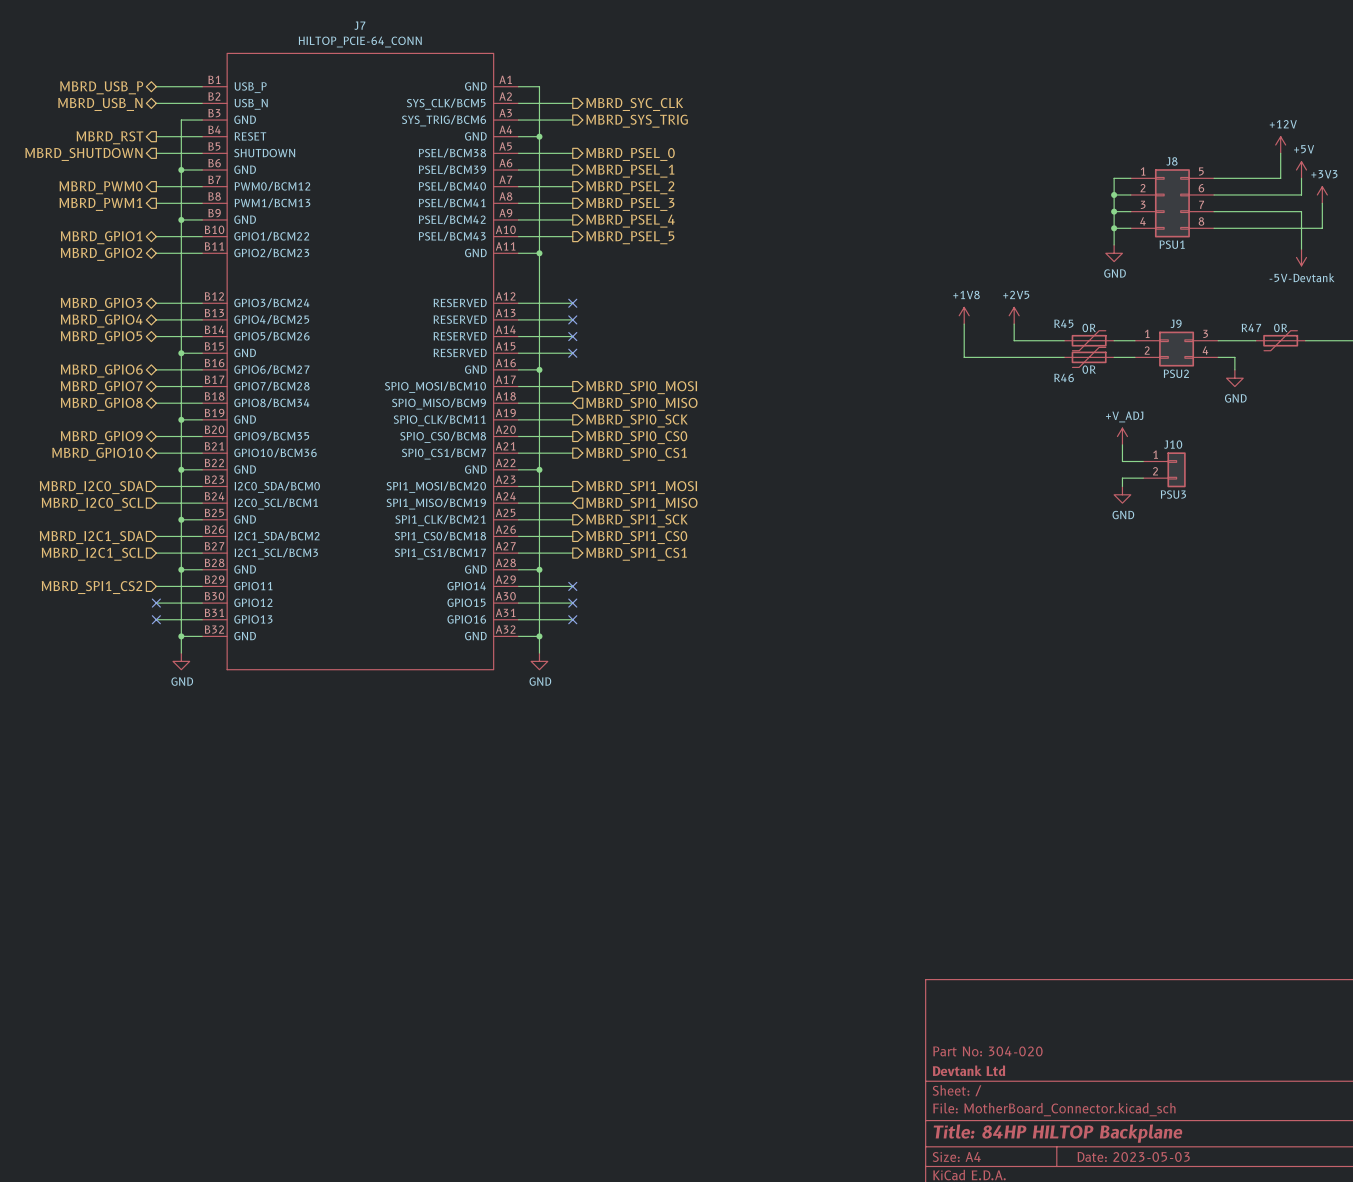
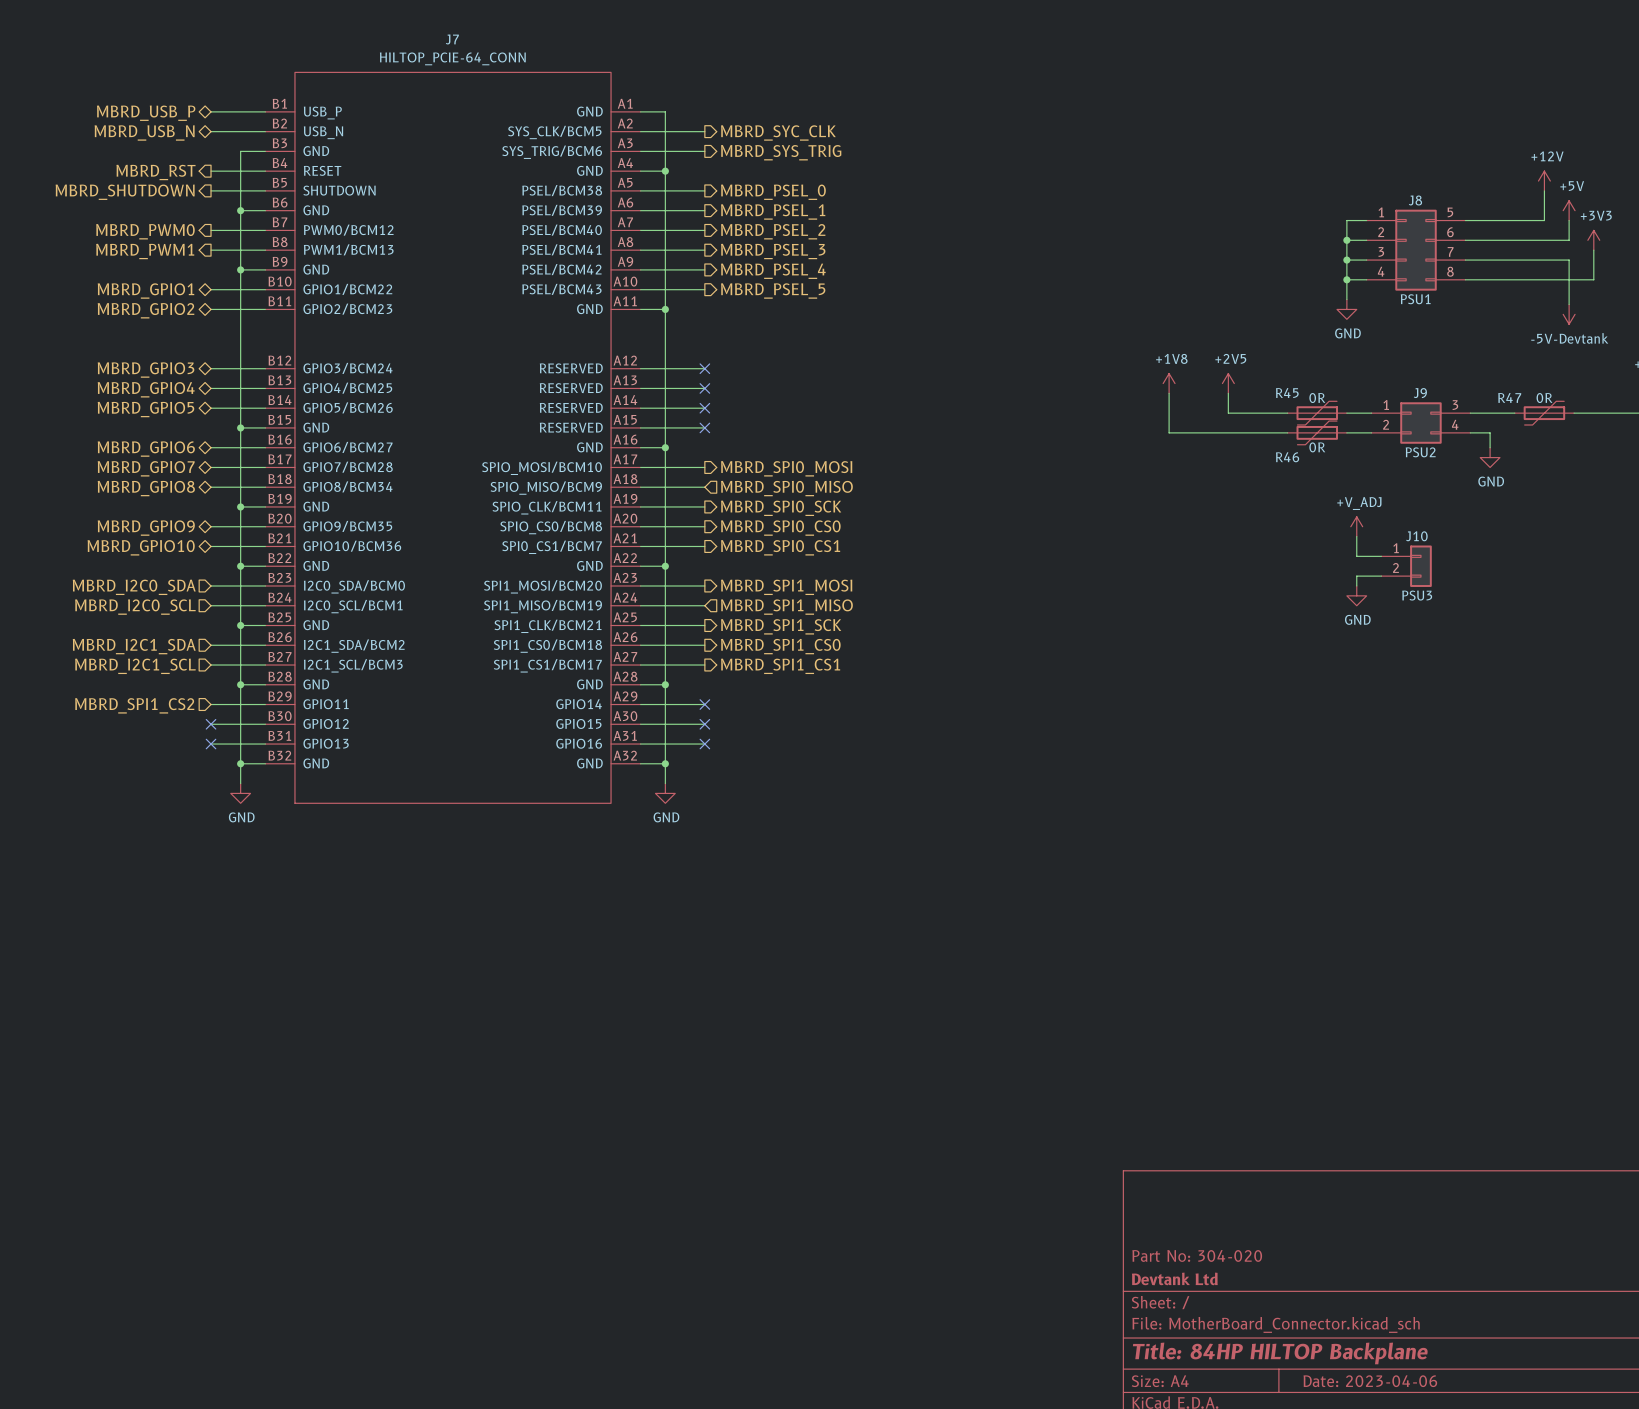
title block: Date: 2023-05-03 (1133, 1157) -> Date: 2023-04-06 (1370, 1381)

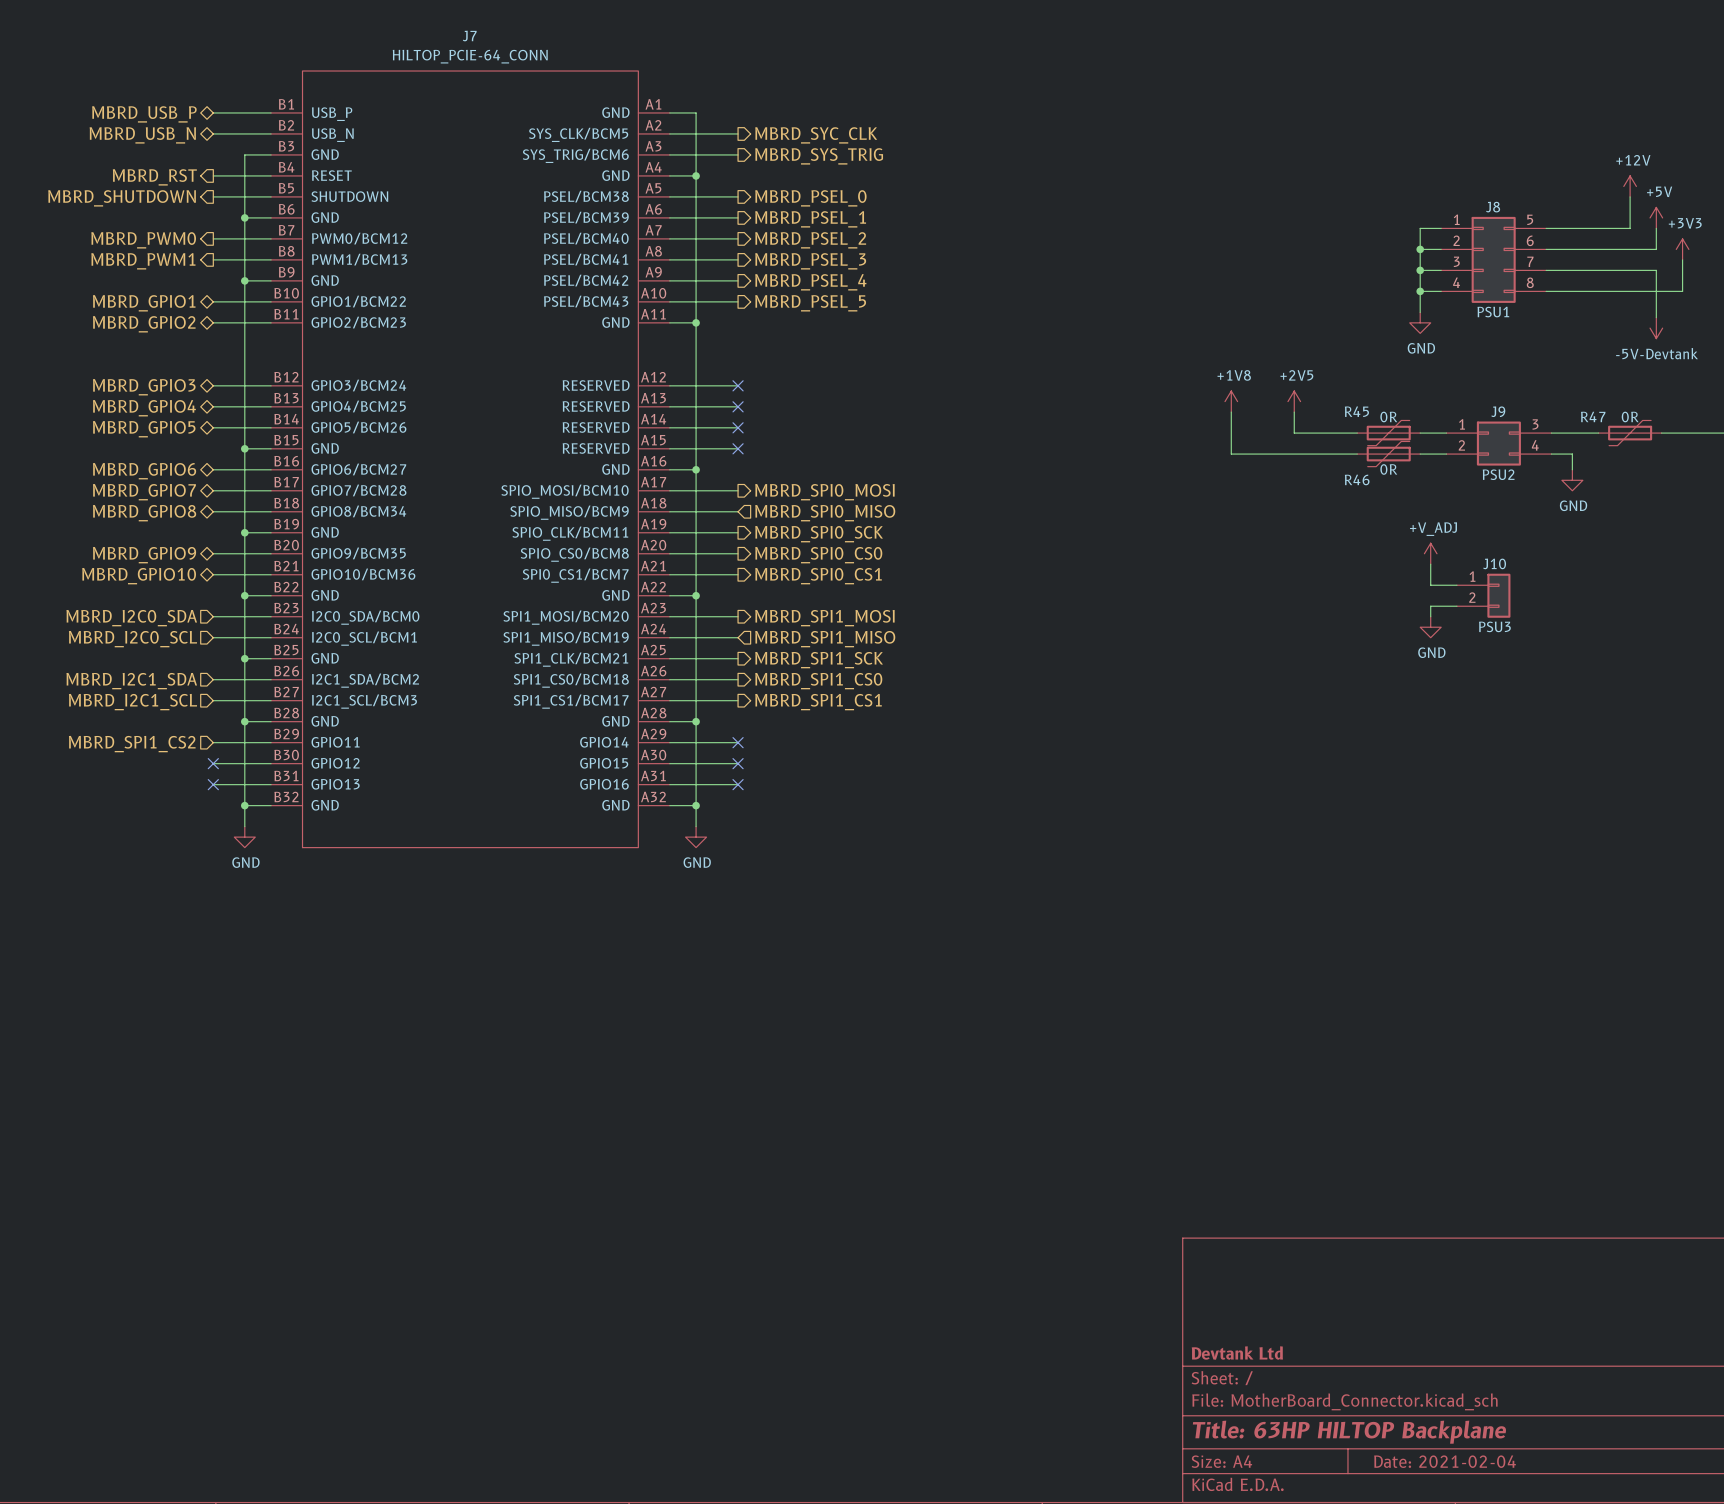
title block: Part No: 304-020 (1197, 1255) -> none
title block: Title: 84HP HILTOP Backplane (1280, 1353) -> Title: 63HP HILTOP Backplane (1349, 1432)
title block: Date: 2023-04-06 (1370, 1381) -> Date: 2021-02-04 (1445, 1461)

